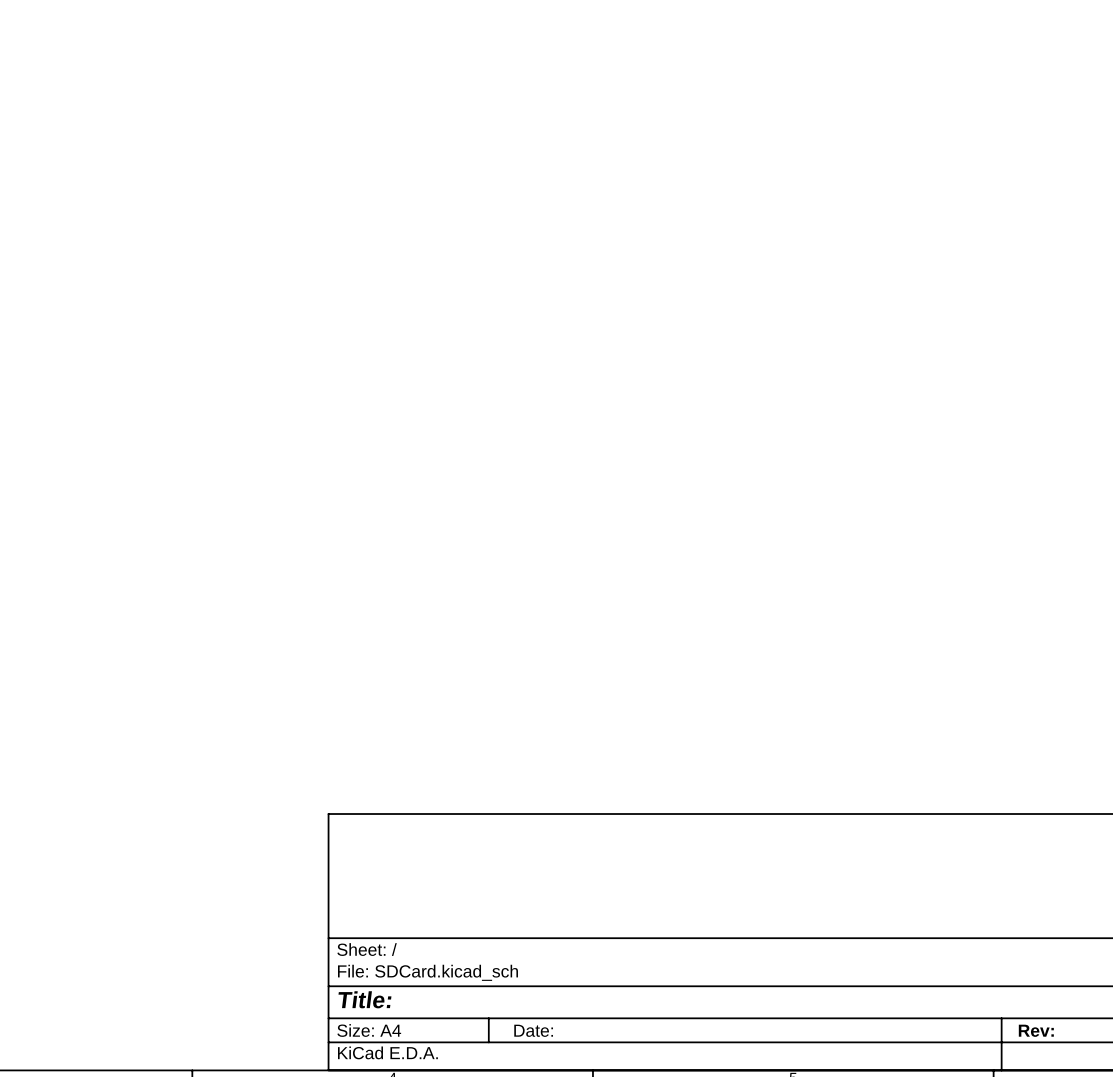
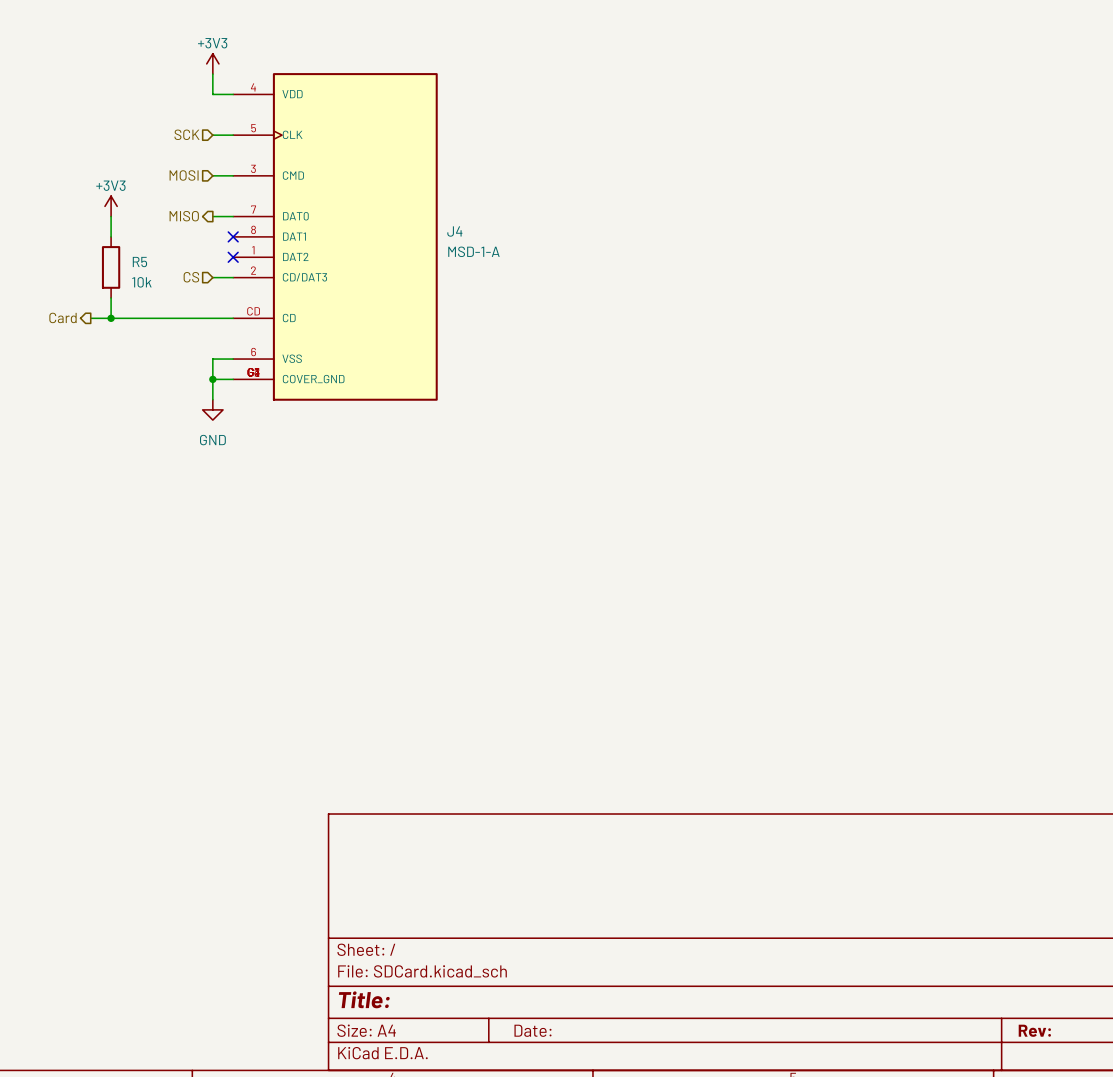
power symbol: none -> +3V3 (212, 63)
wire: none -> (212, 74) (212, 94) (233, 94)
hierarchical label: none -> SCK (187, 134)
wire: none -> (212, 135) (233, 135)
hierarchical label: none -> MOSI (184, 175)
wire: none -> (212, 175) (233, 175)
power symbol: none -> +3V3 (111, 206)
wire: none -> (111, 216) (111, 236)
hierarchical label: none -> MISO (184, 216)
wire: none -> (212, 216) (233, 216)
no-connect mark: none -> (233, 236)
J4: none -> MSD-1-A (335, 236)
no-connect mark: none -> (233, 257)
R5: none -> 10k (111, 267)
hierarchical label: none -> CS (191, 277)
wire: none -> (212, 277) (233, 277)
wire: none -> (111, 297) (111, 318)
hierarchical label: none -> Card (63, 317)
wire: none -> (90, 318) (233, 318)
junction: none -> (111, 318)
wire: none -> (233, 359) (212, 359) (212, 399)
wire: none -> (212, 379) (233, 379)
junction: none -> (212, 379)
power symbol: none -> GND (212, 409)

